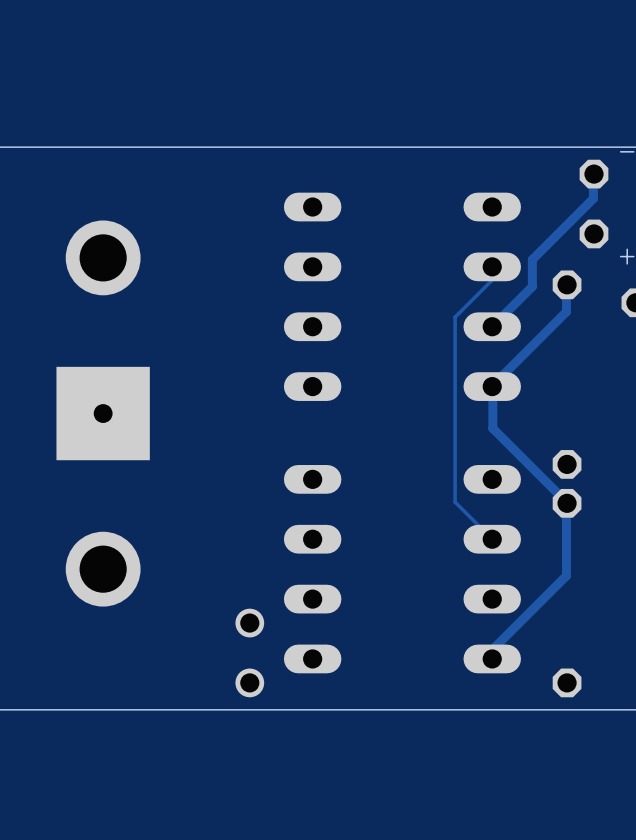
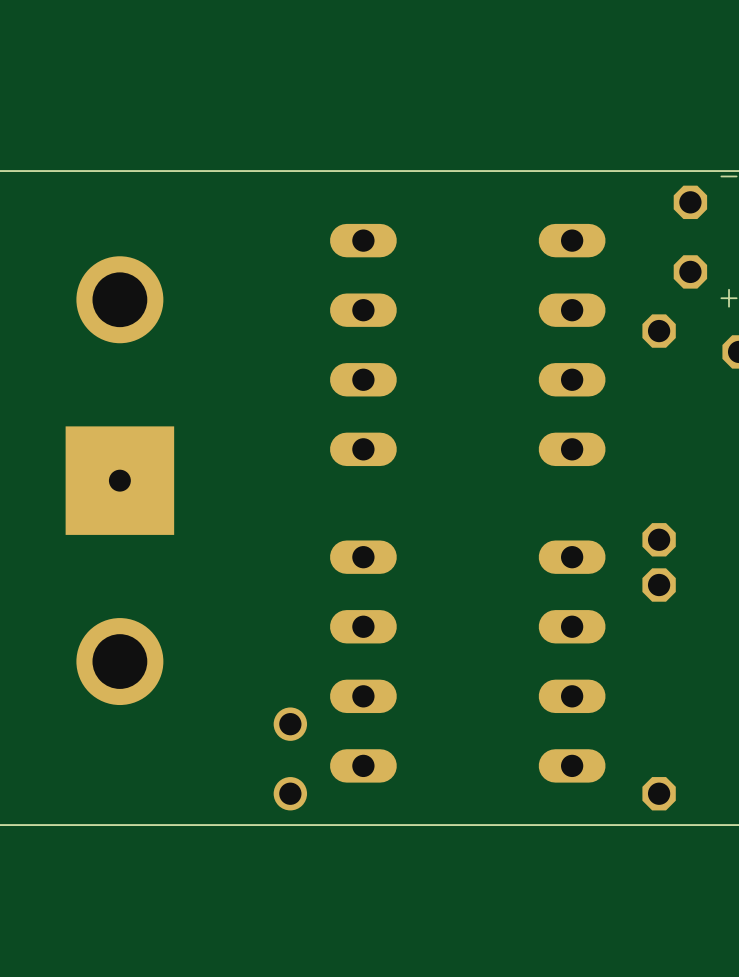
track: (594, 174) (593, 198) (532, 259) (532, 286) (492, 326) -> none
track: (492, 266) (491, 281) (455, 317) (455, 502) (492, 539) -> none
track: (567, 284) (566, 311) (492, 386) (492, 428) (567, 503) (566, 575) (492, 649) (492, 658) -> none

